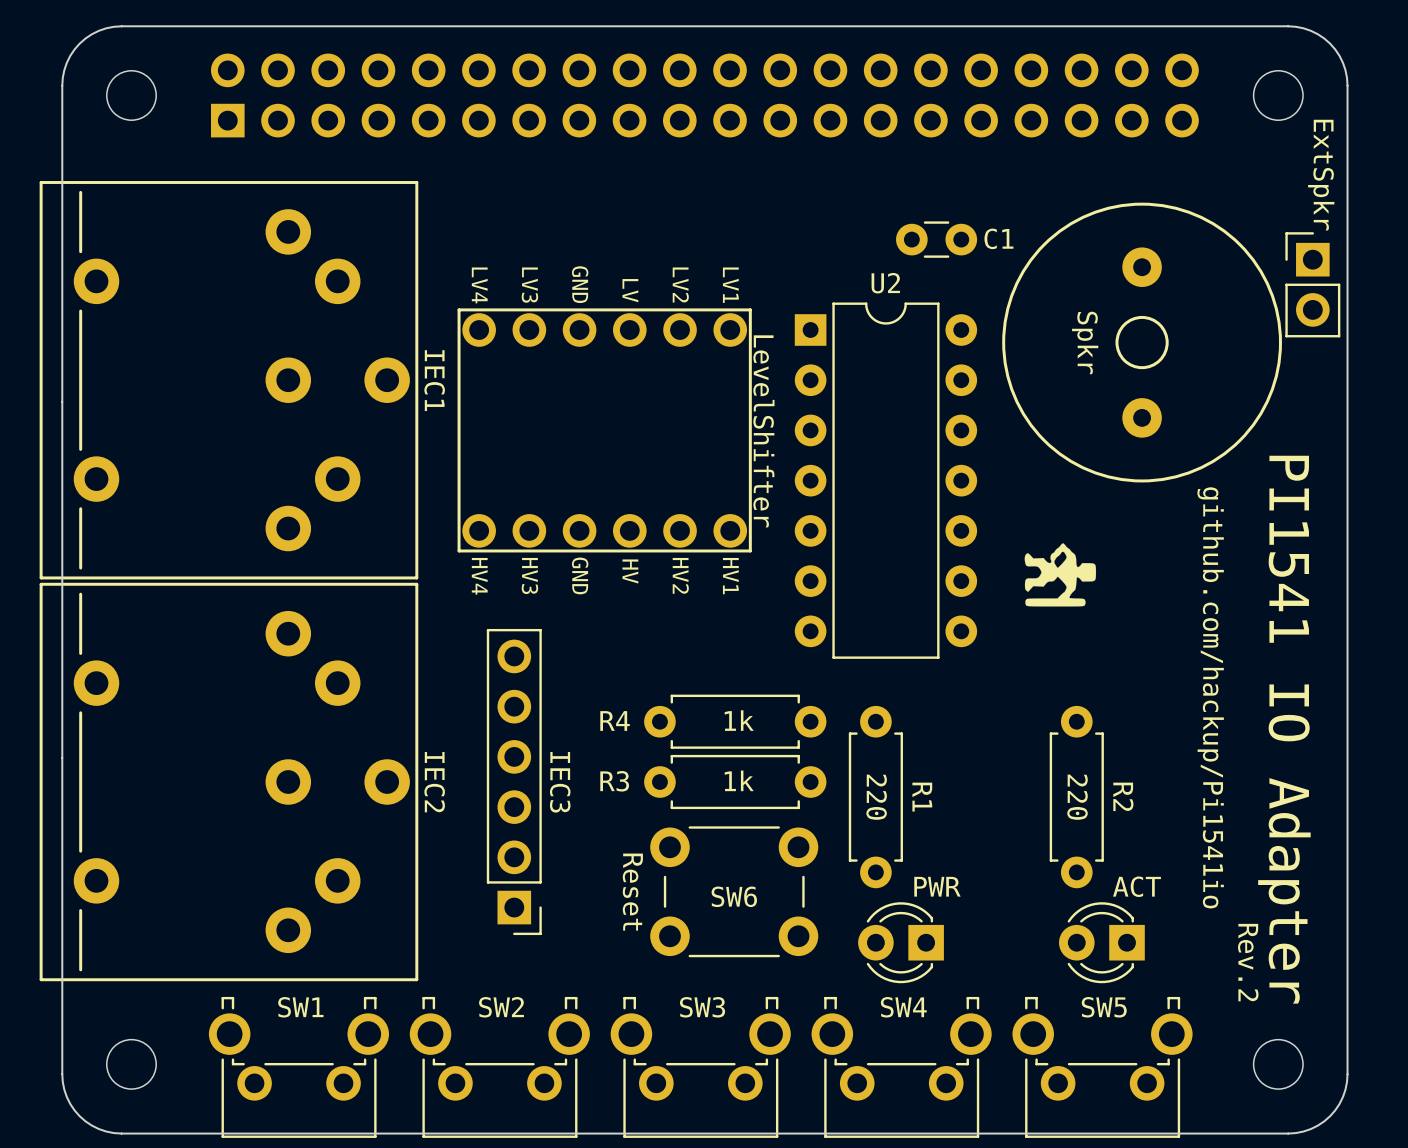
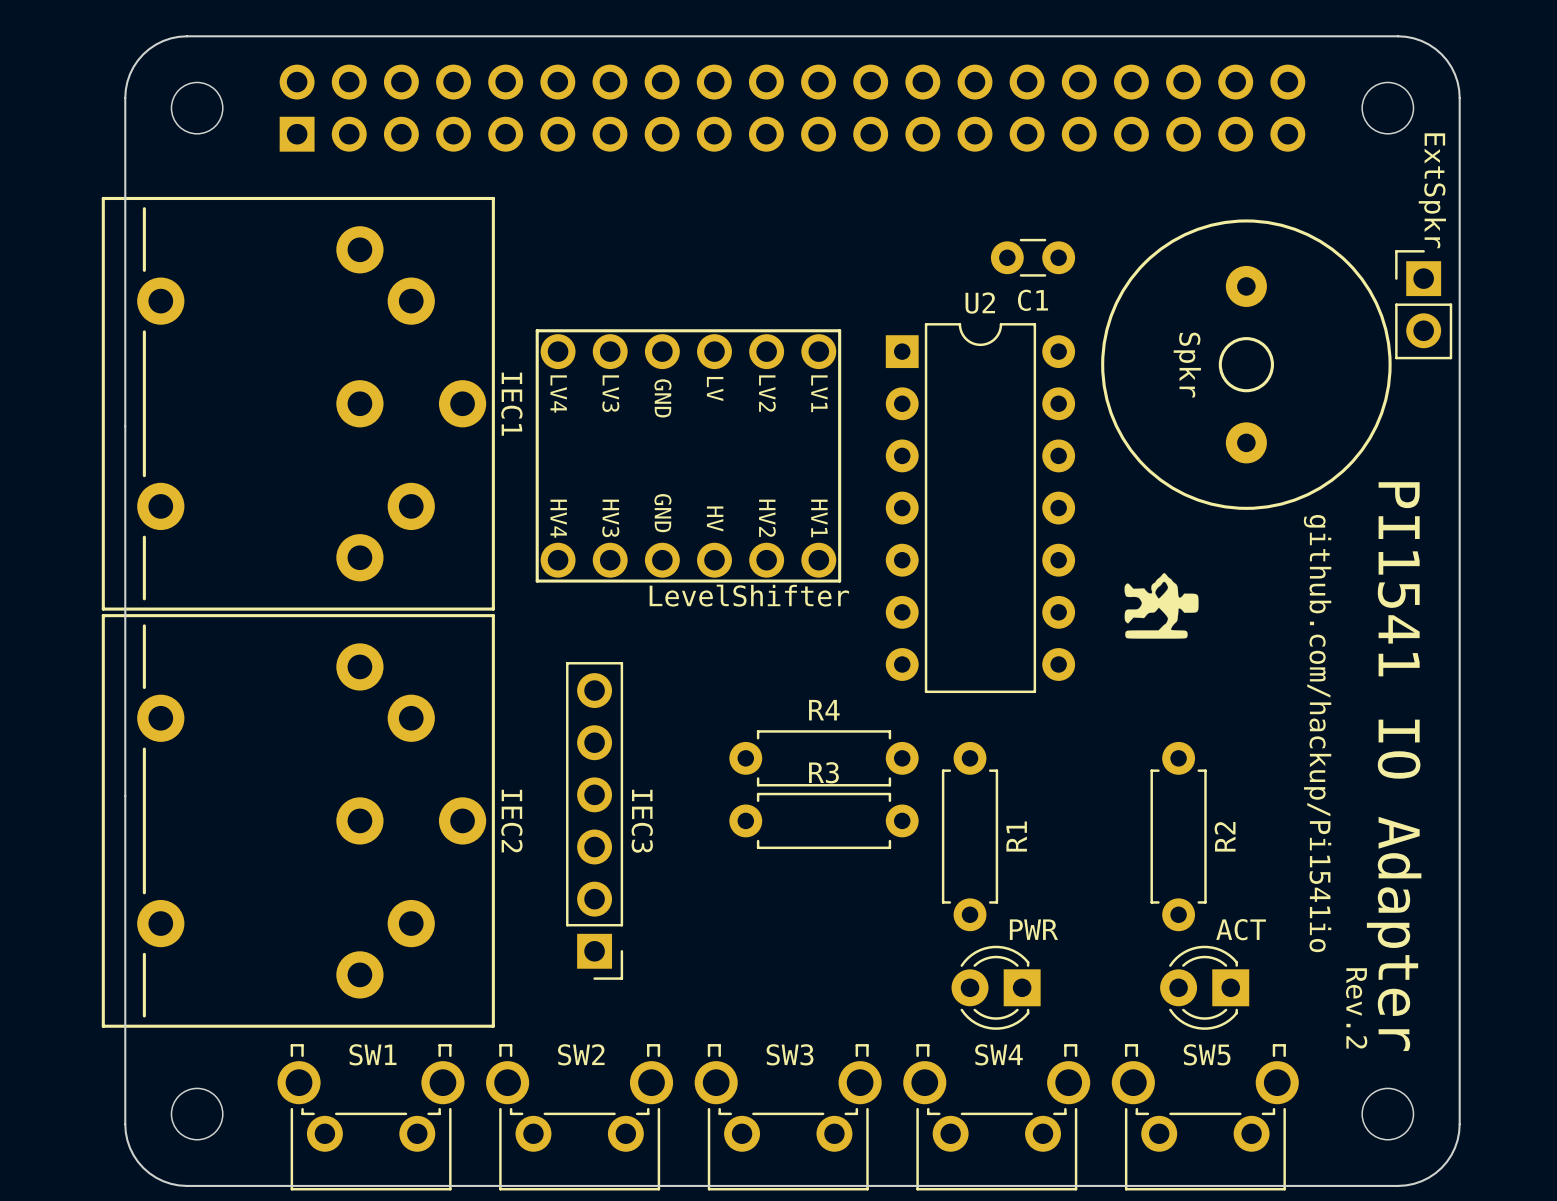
C1 name position: C1 (998, 238) -> C1 (1033, 300)
part footprint: [457, 308, 752, 553] -> [535, 329, 842, 583]
part value position: LevelShifter (763, 431) -> LevelShifter (749, 595)
R4 name position: R4 (615, 720) -> R4 (824, 710)
R4 value: 1k (739, 720) -> none
R3 value: 1k (739, 780) -> none
R3 name position: R3 (614, 781) -> R3 (823, 772)
R2 name rotation: 0° (1123, 796) -> 180° (1225, 836)
R1 value: 220 (876, 797) -> none
R1 name rotation: 0° (922, 797) -> 180° (1016, 836)
R2 value: 220 (1077, 797) -> none
SW6: Reset (734, 891) -> none

